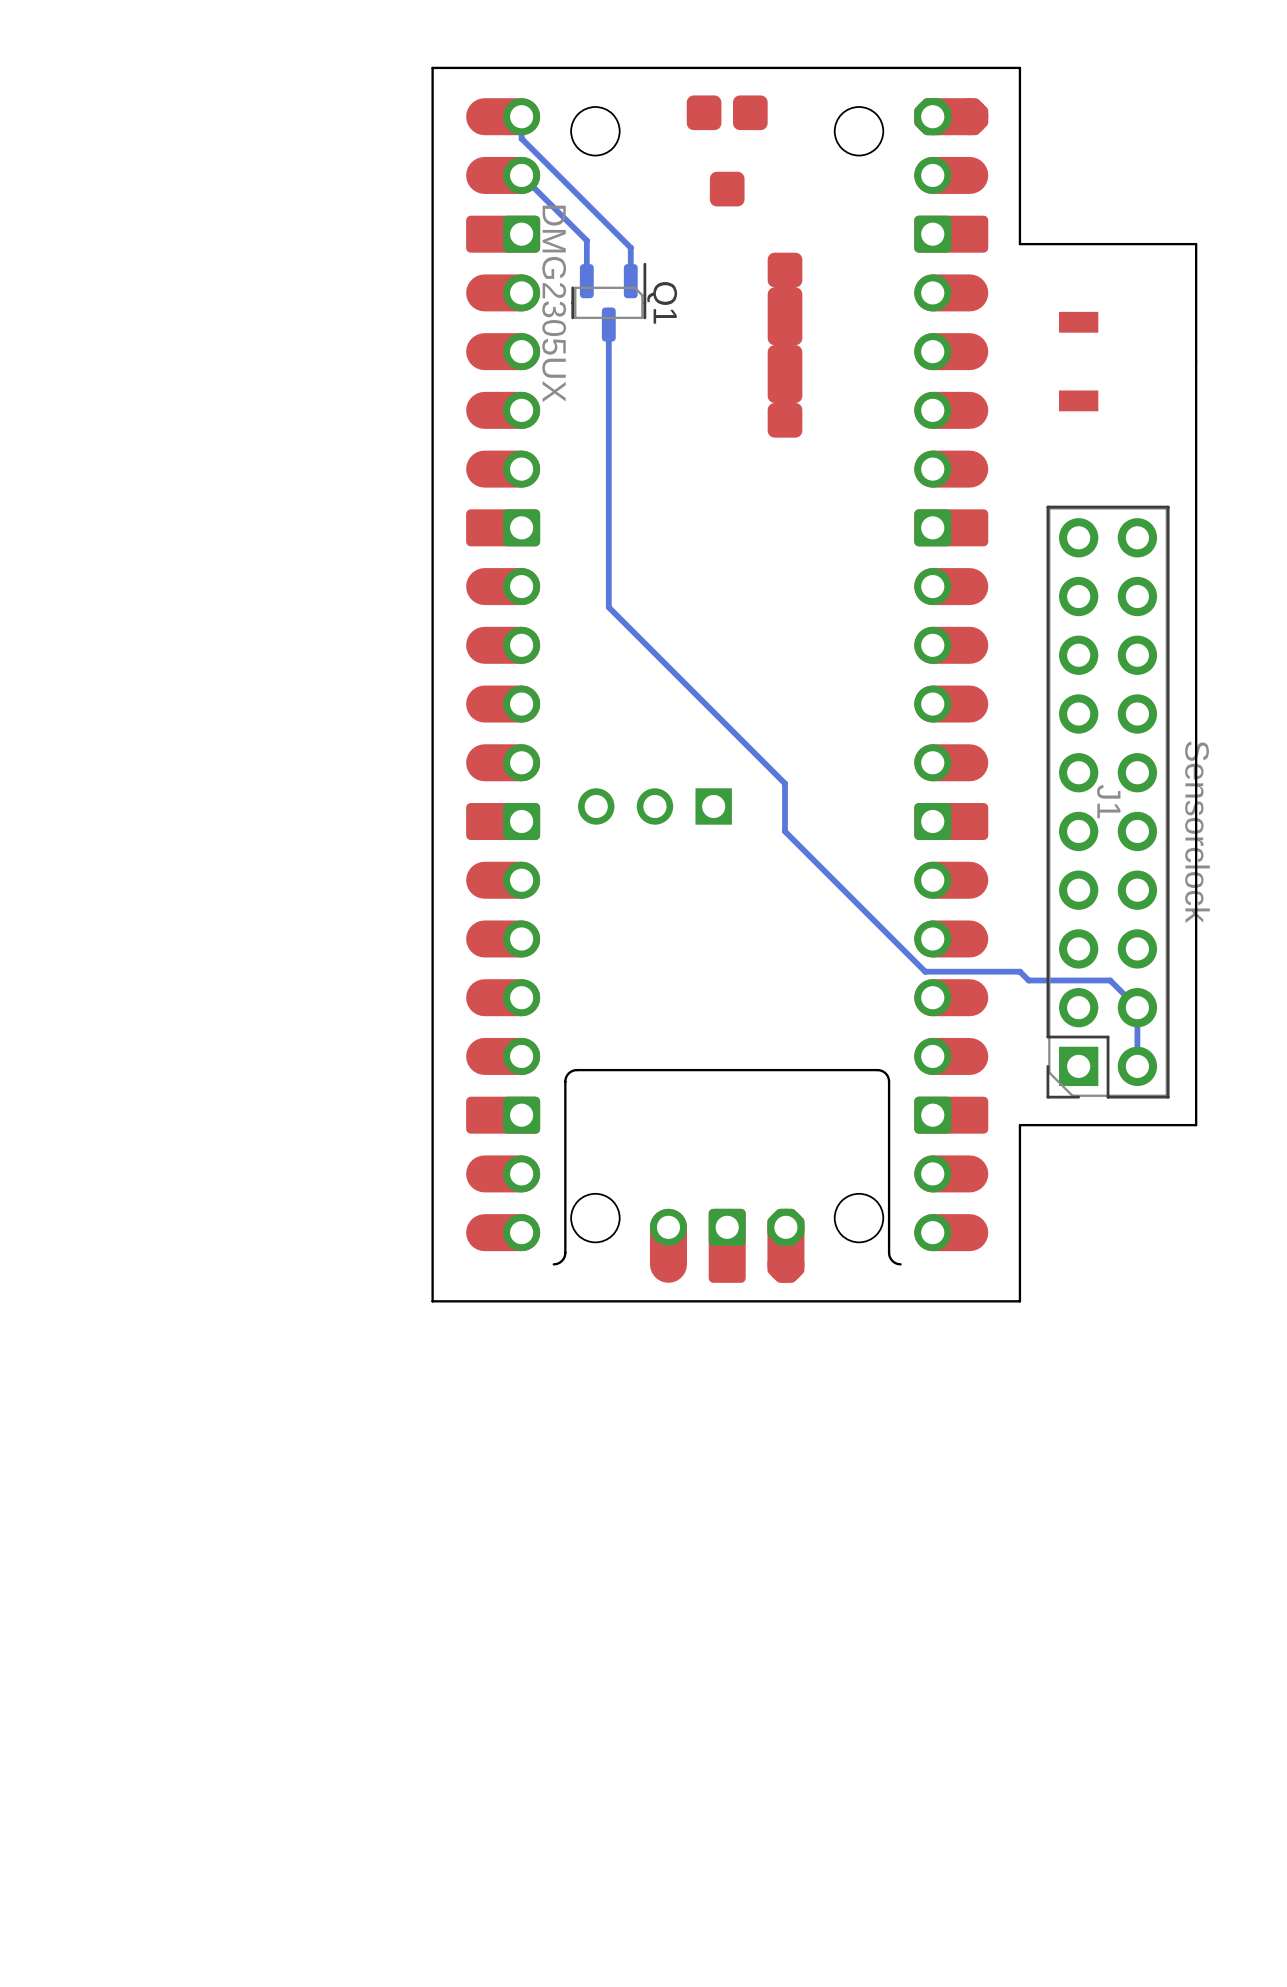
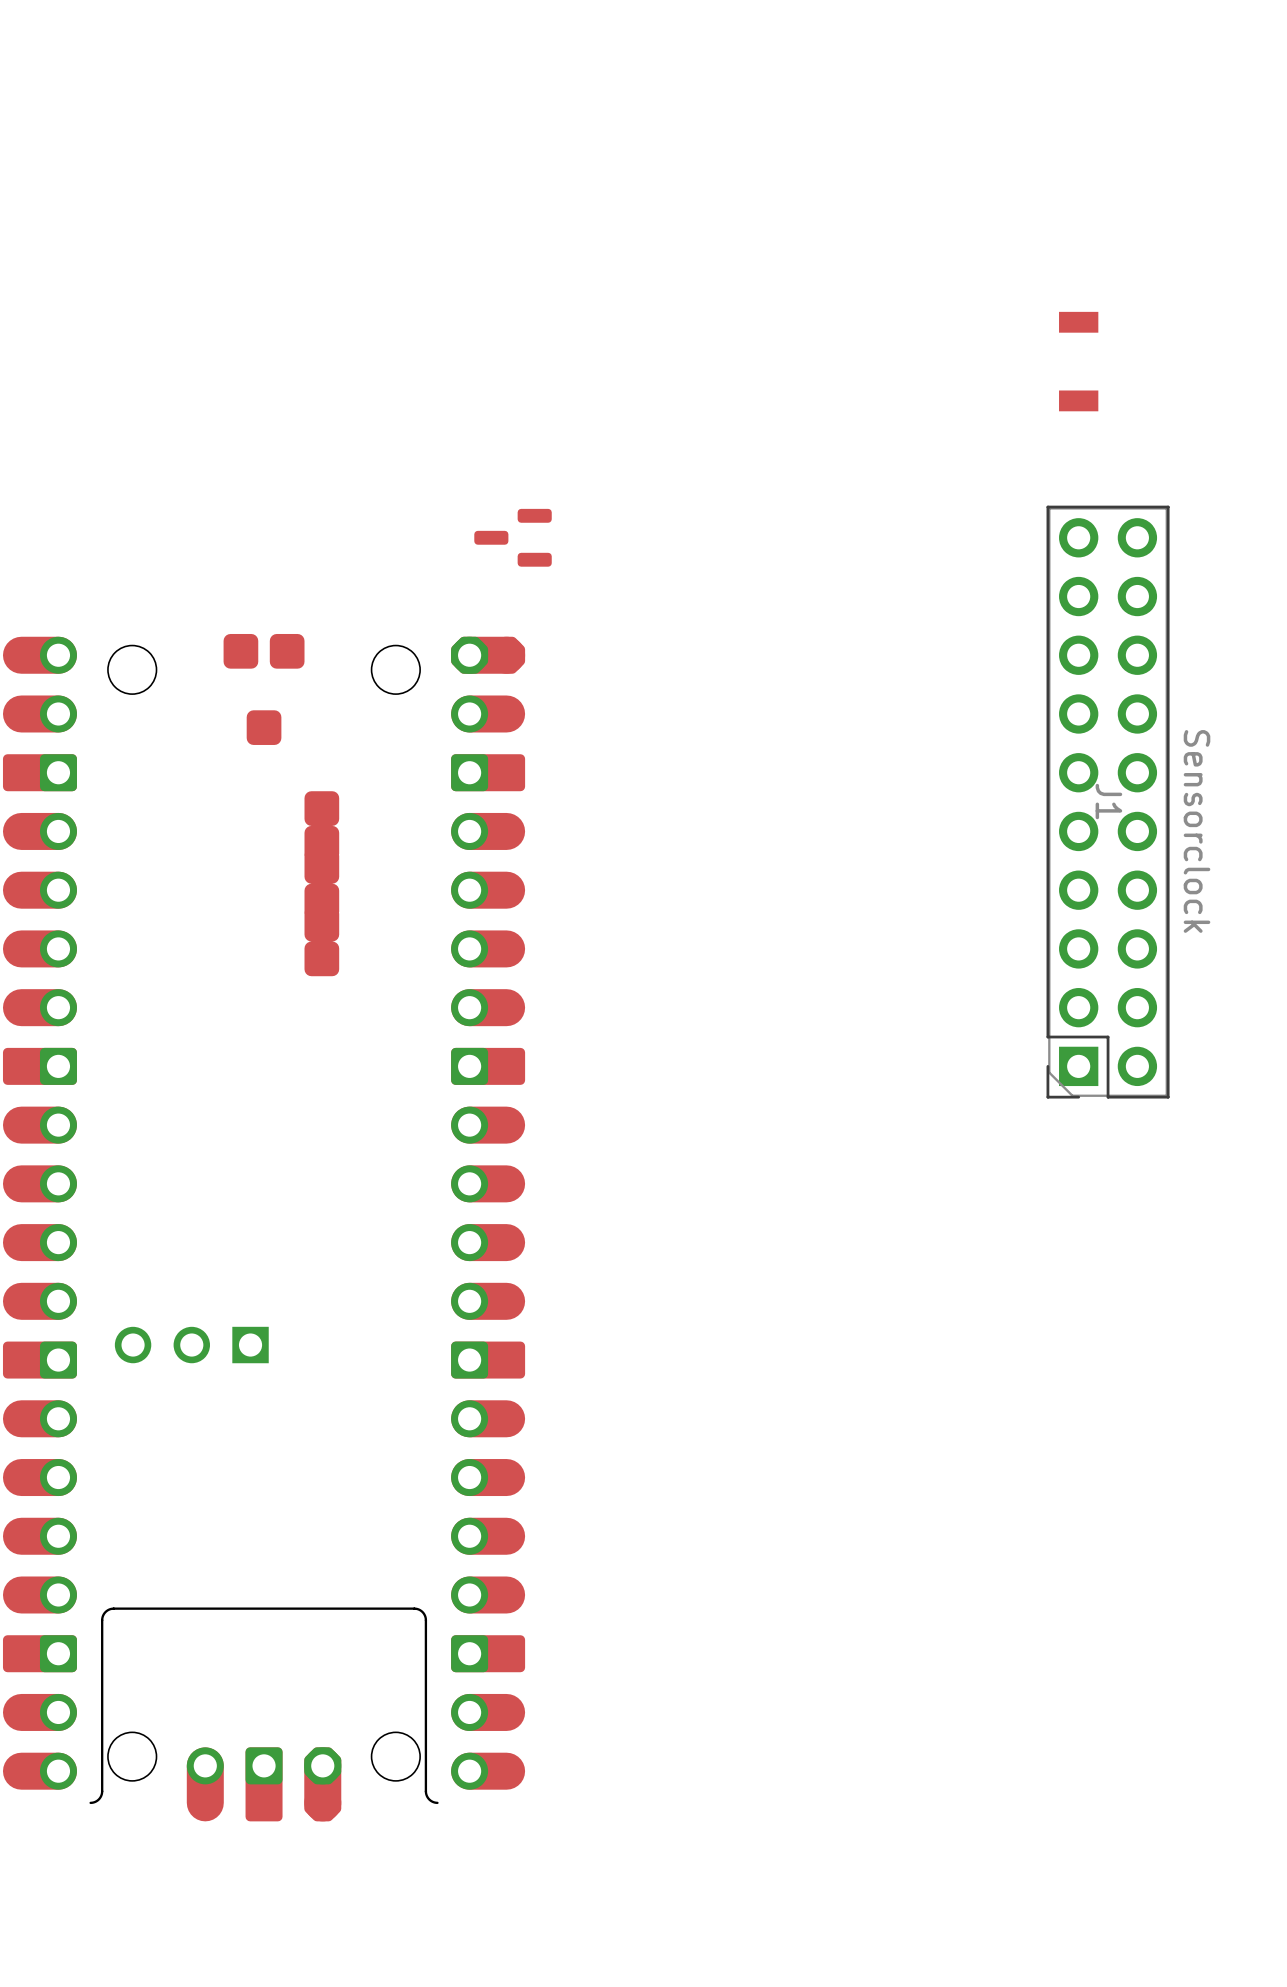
board edge: (1019, 67) (1019, 244) (1196, 244) (1196, 1125) (1019, 1125) (1019, 1301) (432, 1301) (432, 67) (1019, 67) -> none
bottom track: (521, 116) (521, 138) (630, 247) (630, 281) -> none
bottom track: (521, 175) (586, 240) (586, 281) -> none
Q1 side: bottom (608, 302) -> top (513, 537)
bottom track: (608, 324) (608, 607) (785, 783) (785, 831) (925, 971) (1019, 971) (1028, 980) (1110, 980) (1137, 1007) (1137, 1066) -> none
part: (727, 689) -> none
part: none -> (264, 1227)

